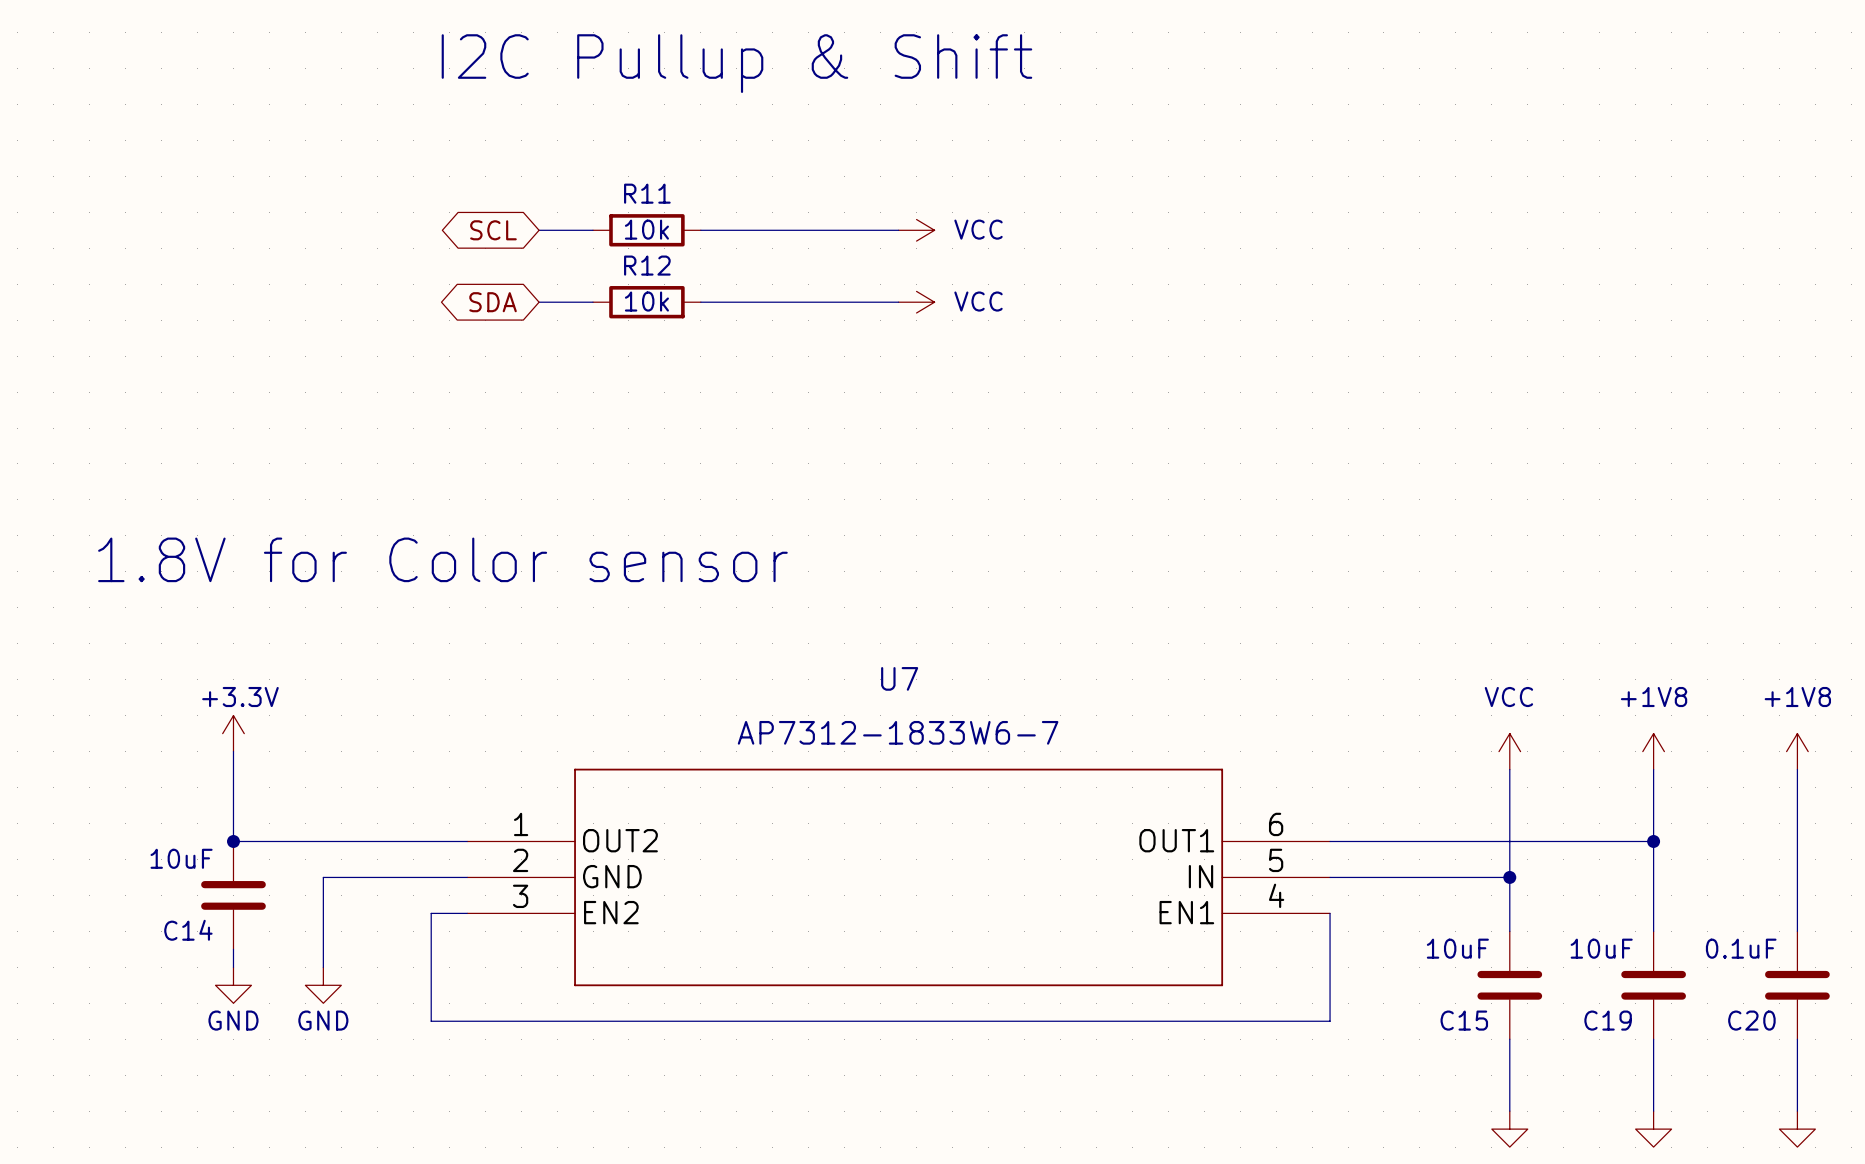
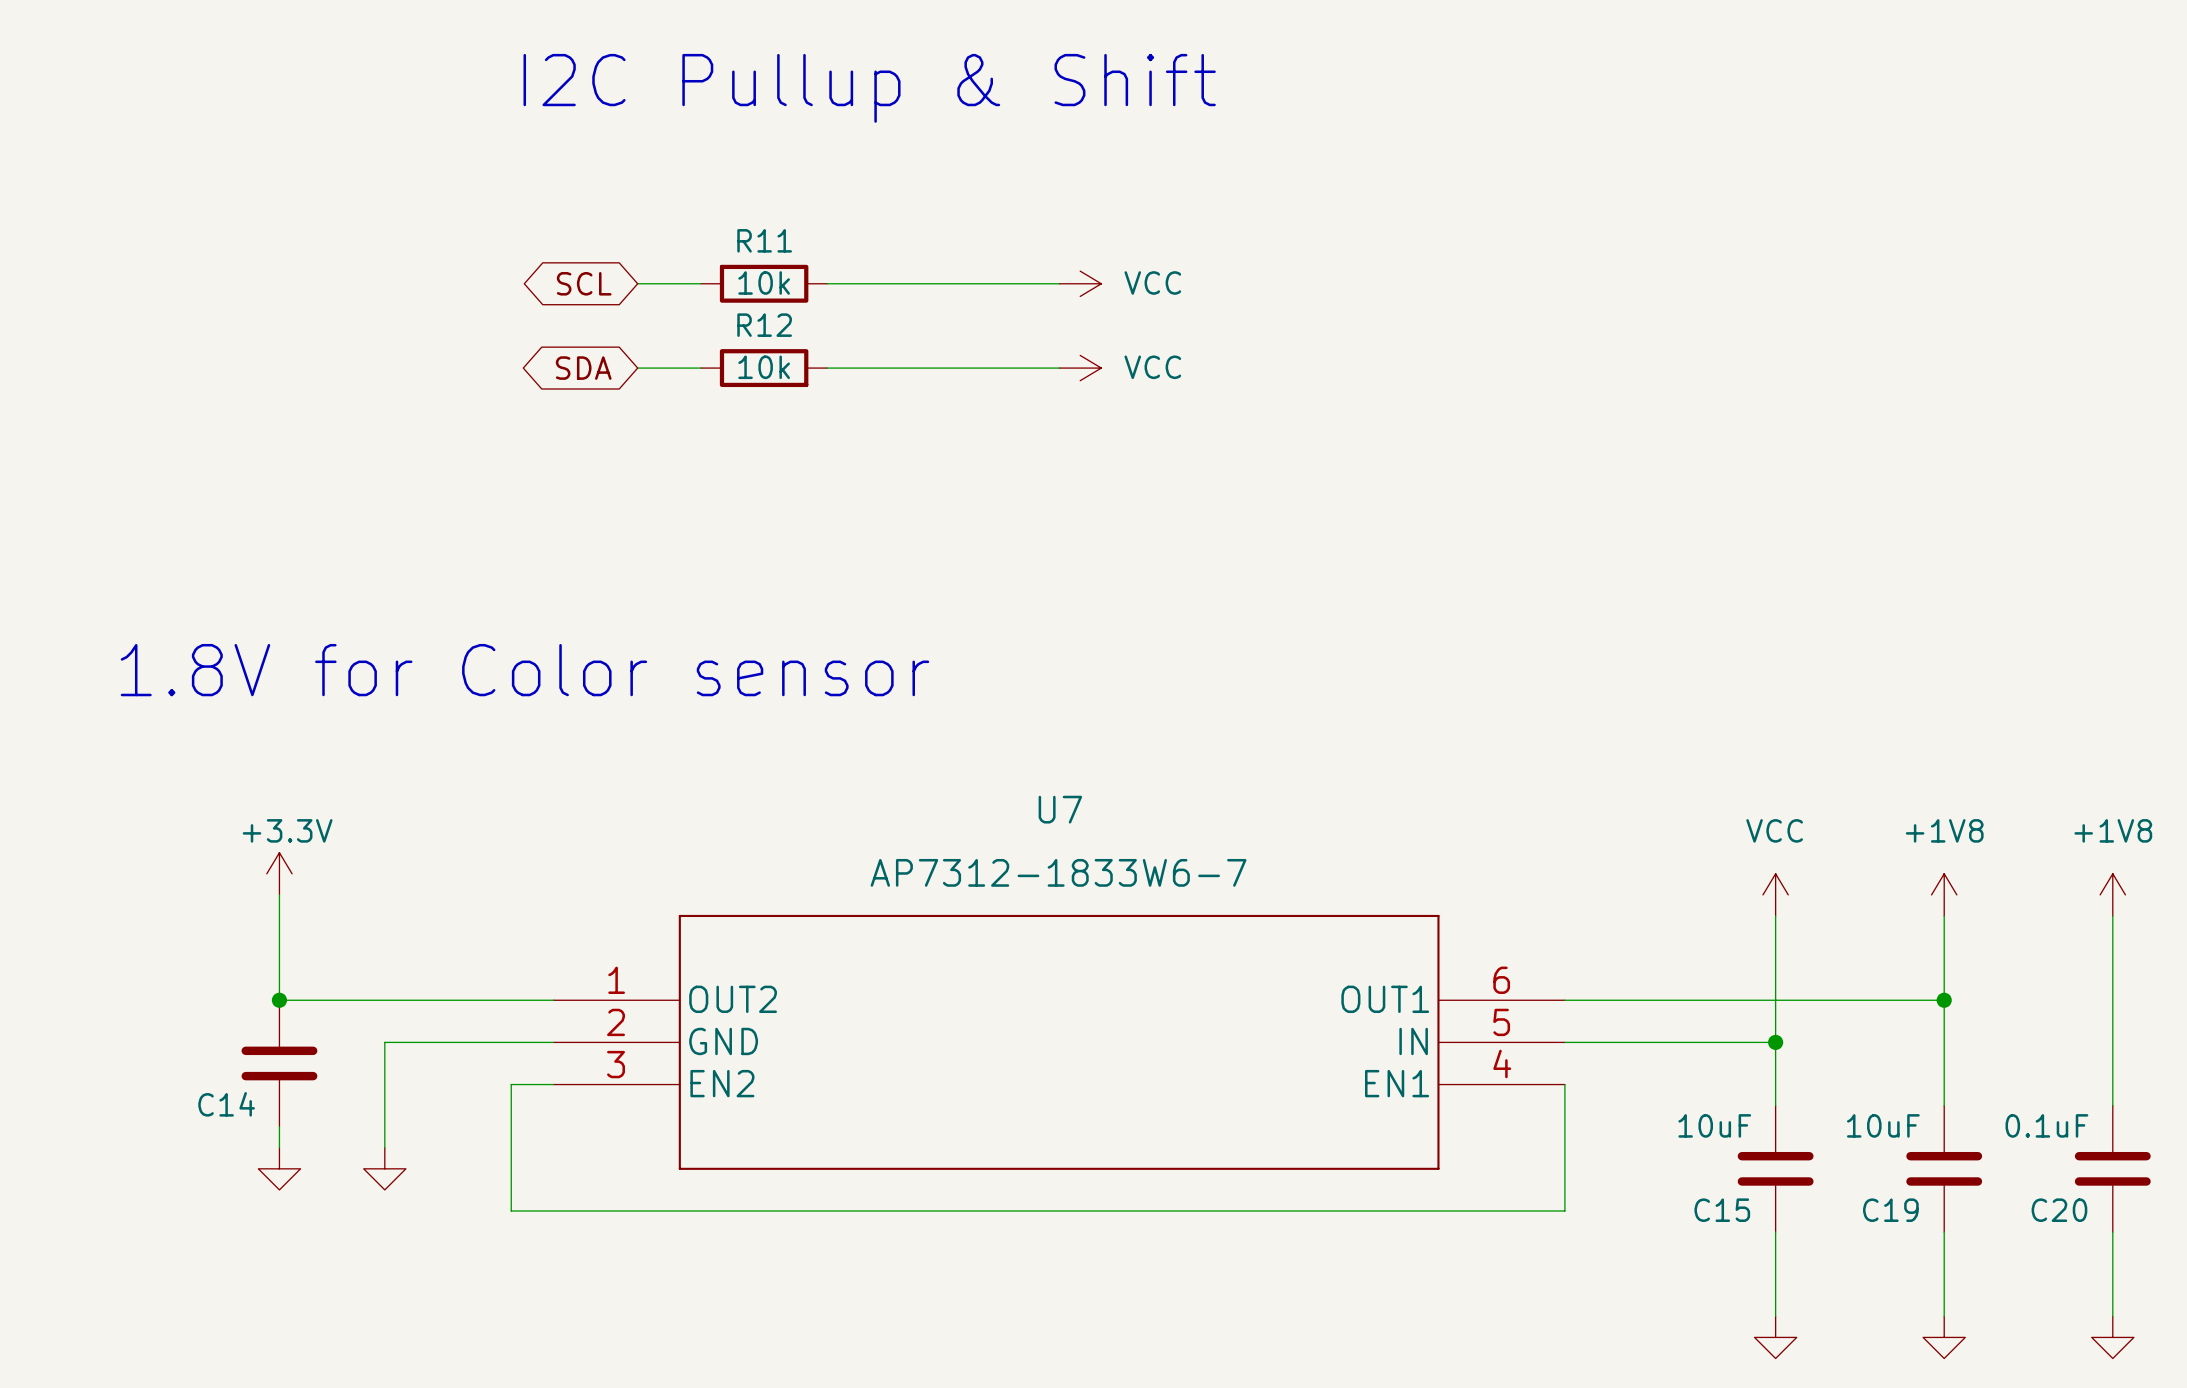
C14 value: 10uF (181, 858) -> none
power symbol text: GND (233, 1020) -> none
power symbol text: GND (323, 1020) -> none

